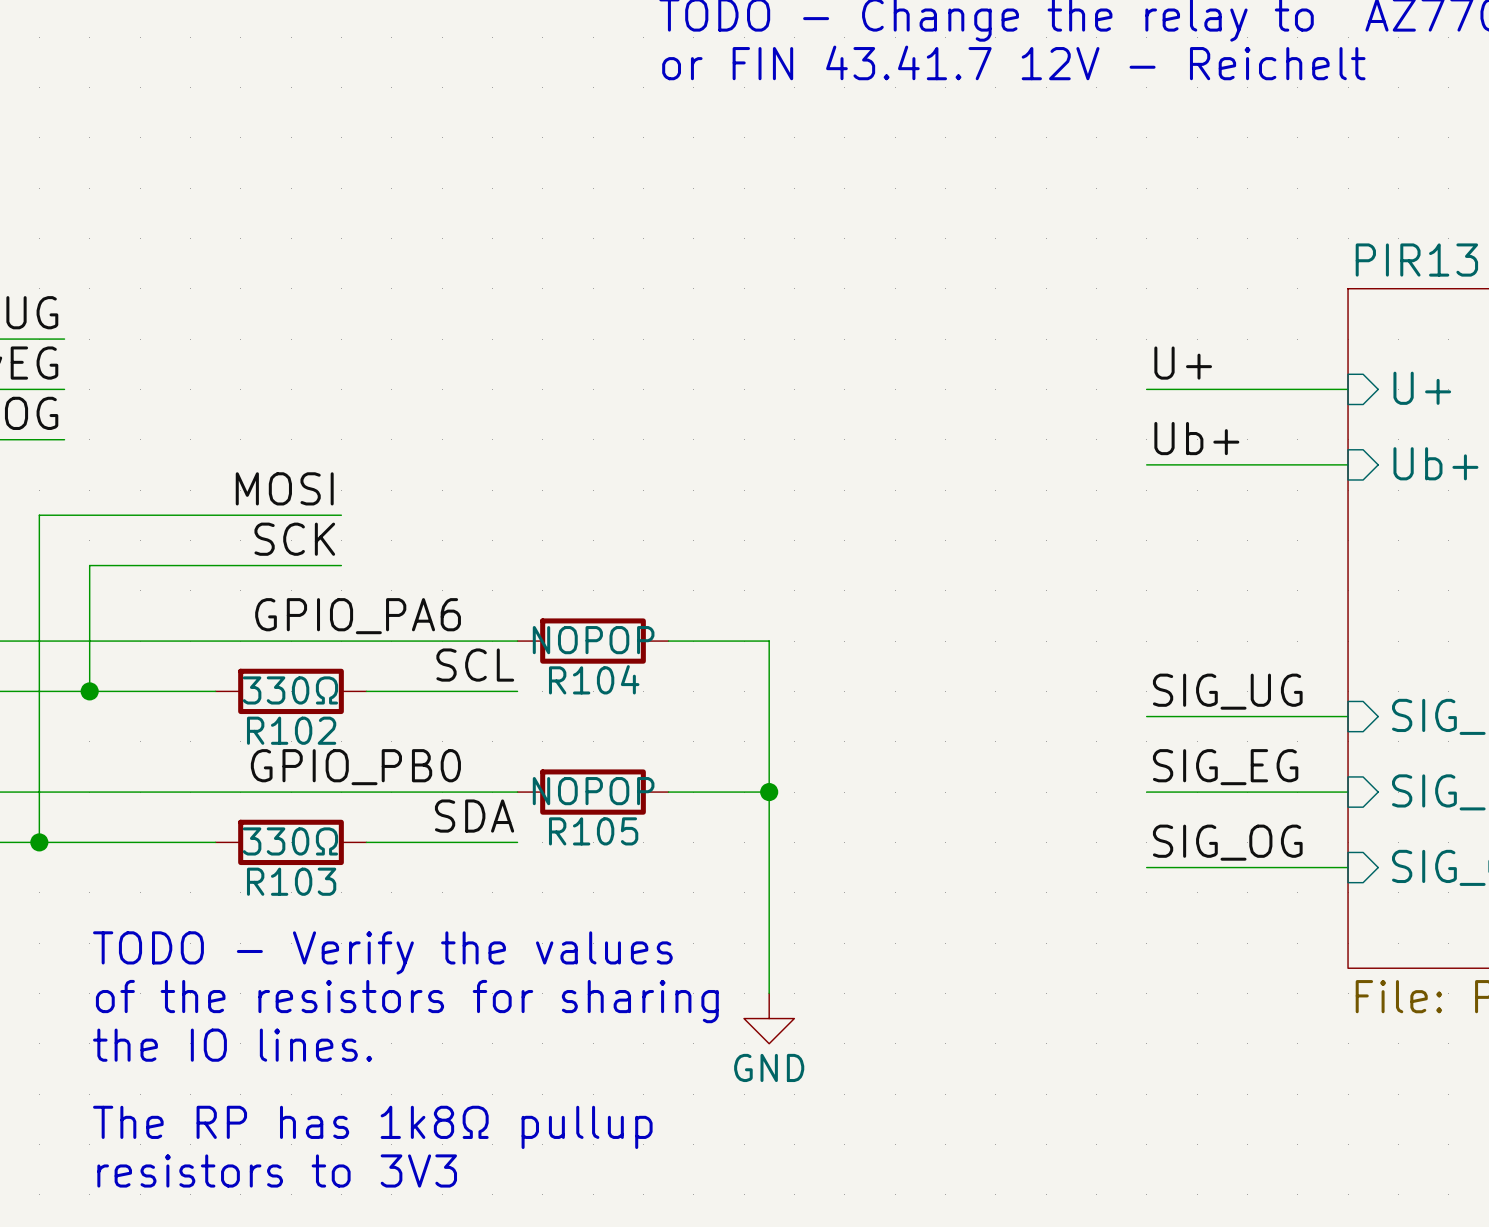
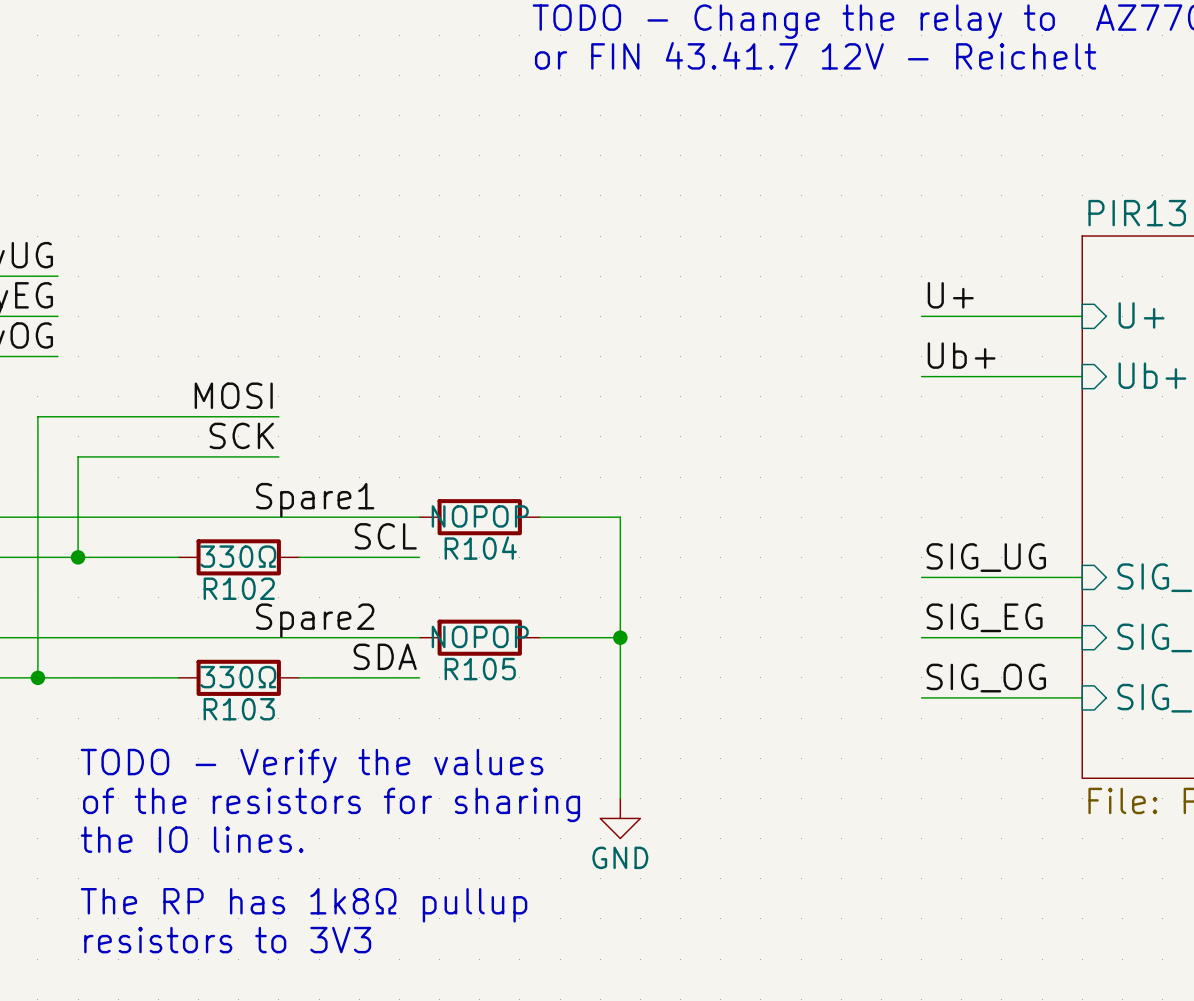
label: GPIO_PA6 (358, 616) -> Spare1 (315, 500)
label: GPIO_PB0 (355, 767) -> Spare2 (315, 620)

